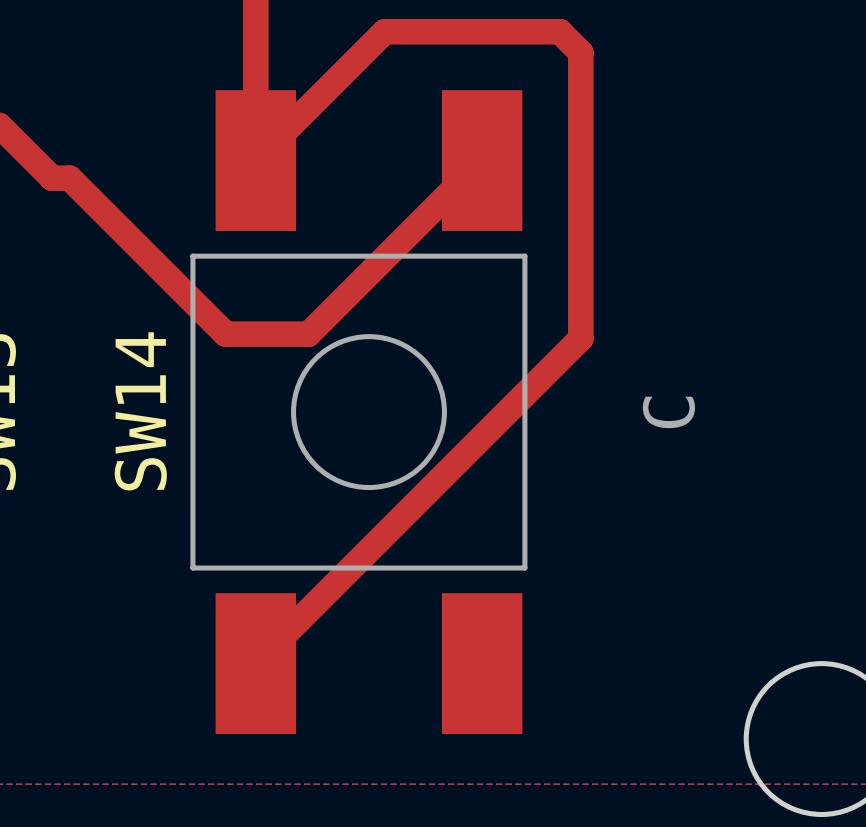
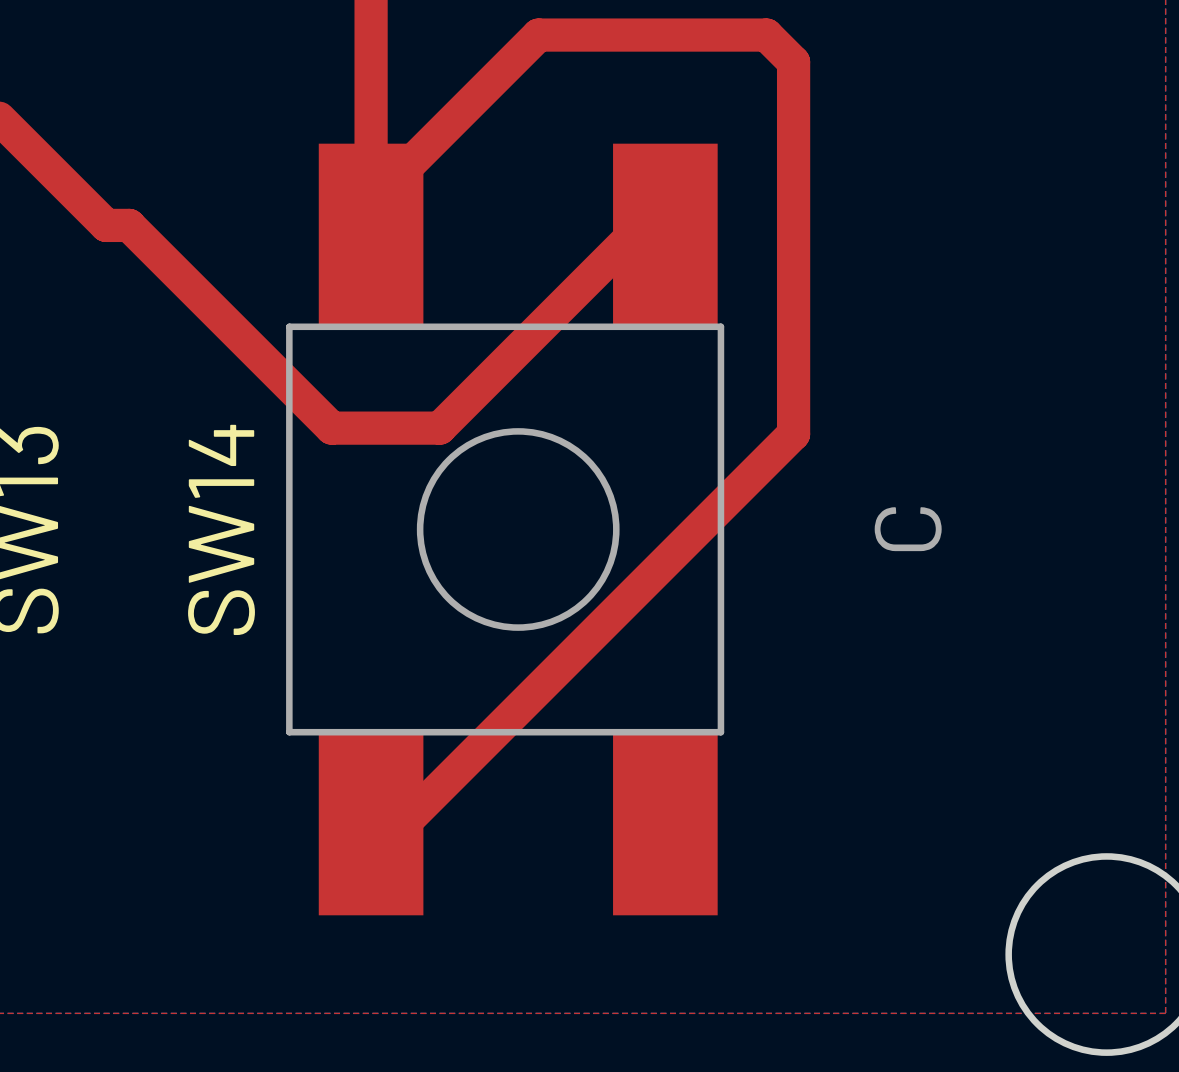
SW14 footprint: [190, 90, 528, 735] -> [286, 143, 725, 916]

